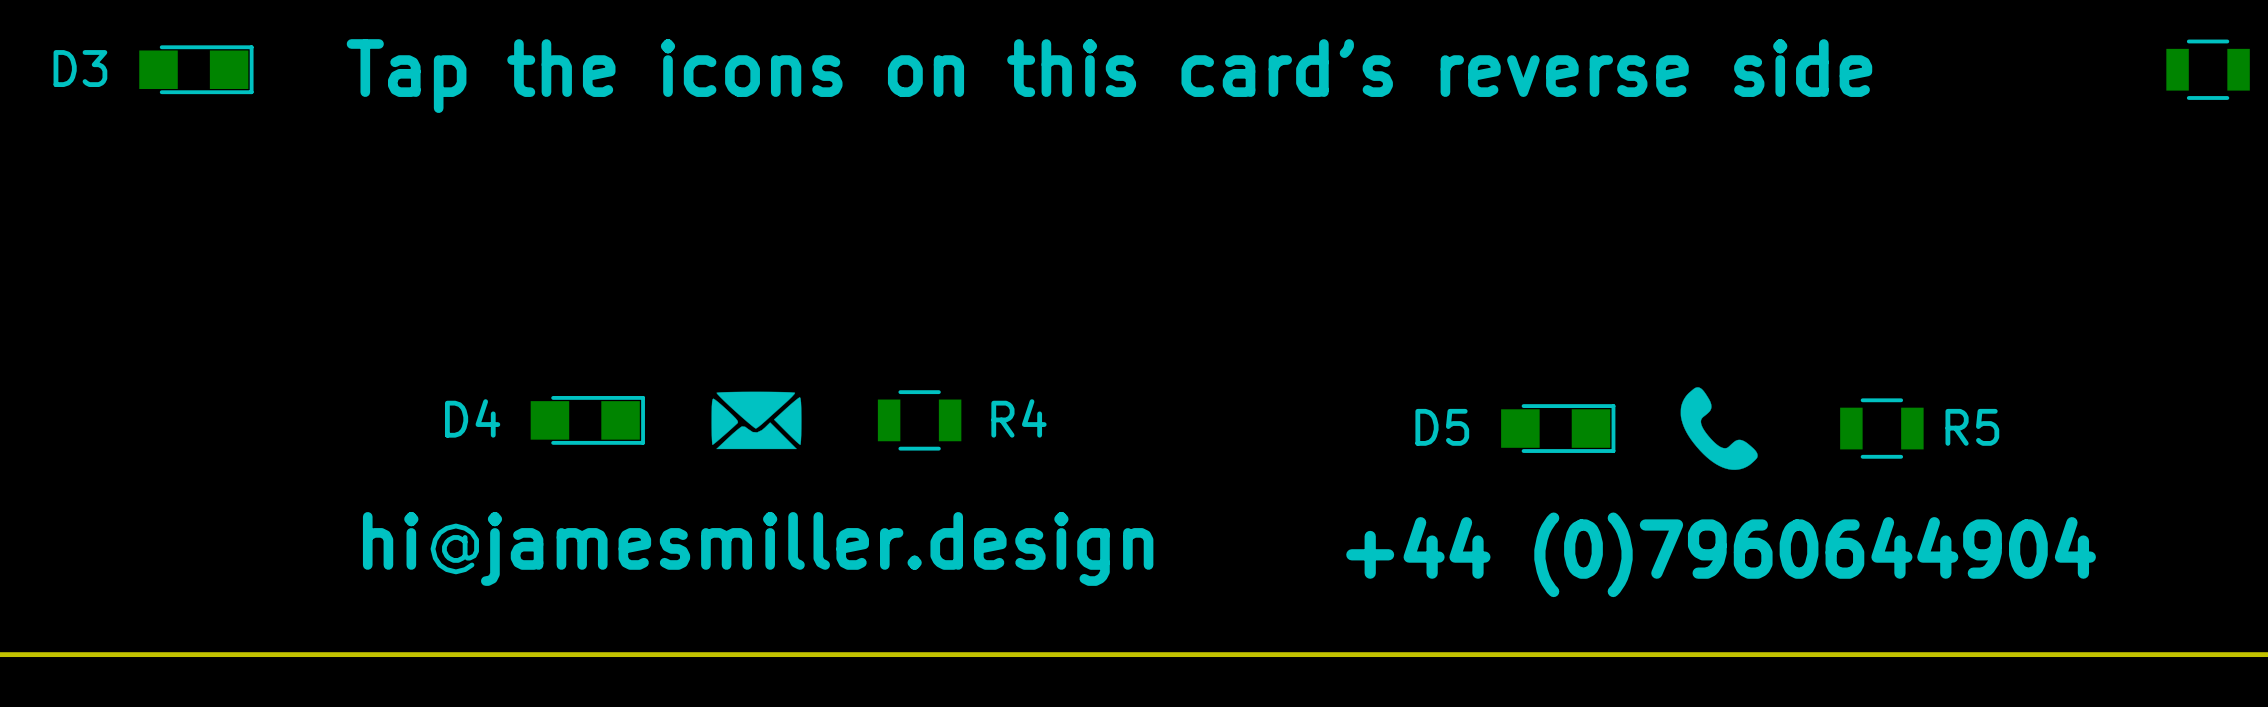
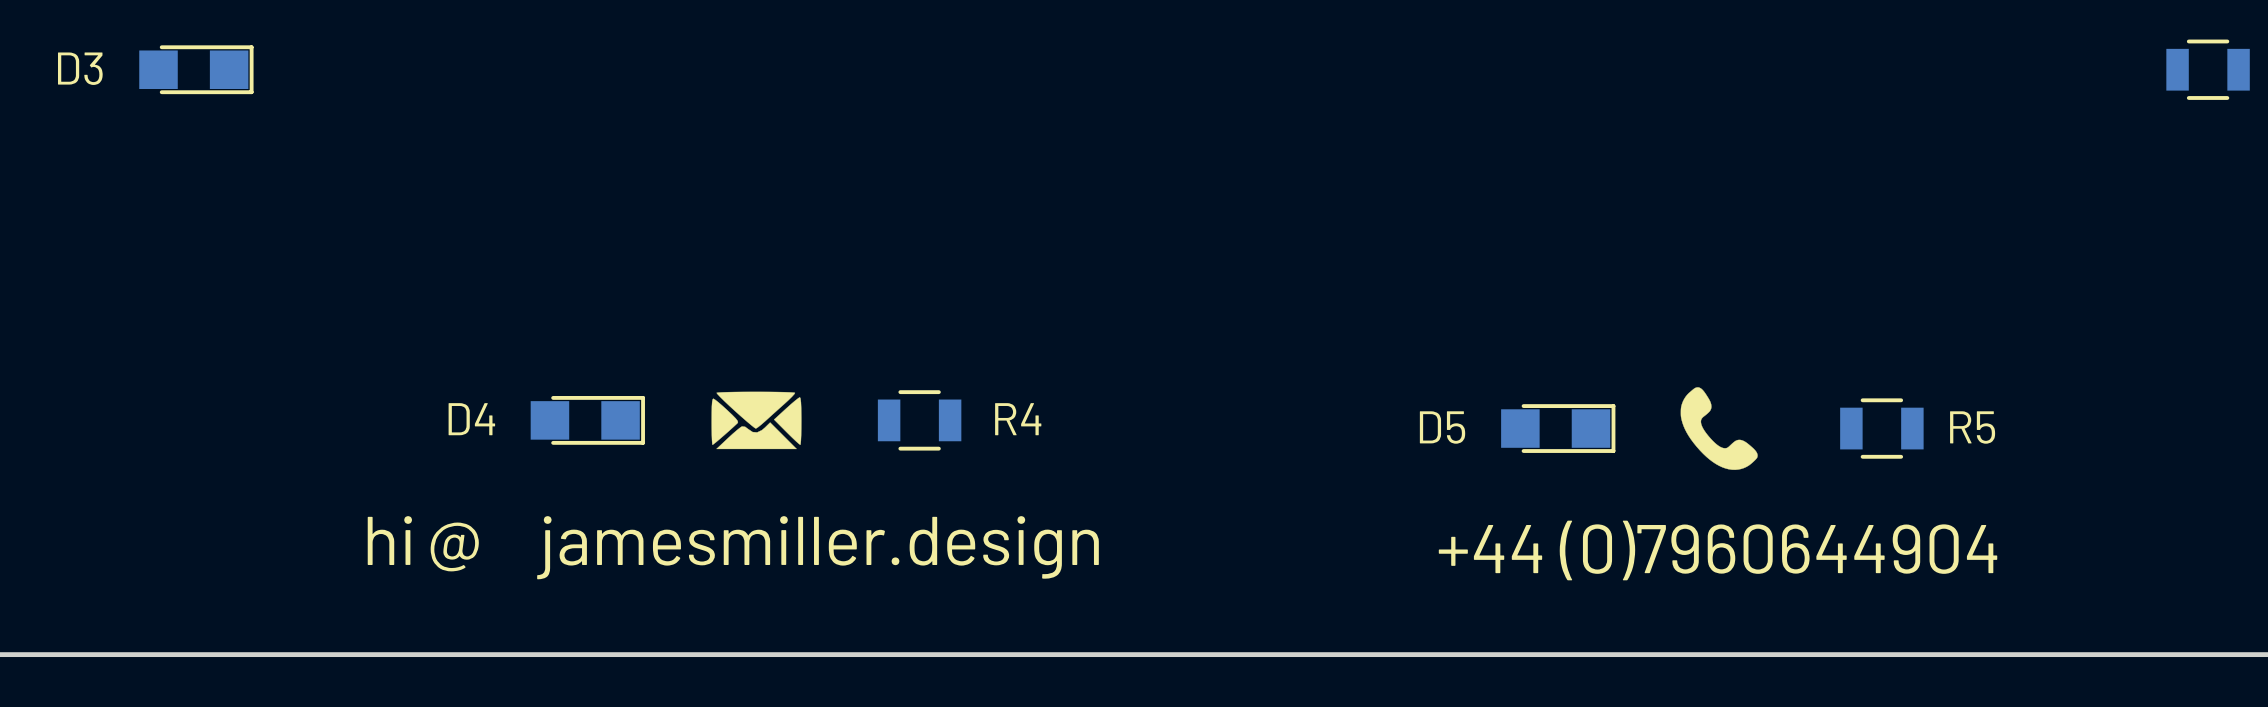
text: Tap the icons on this card’s reverse side (1109, 76) -> none

